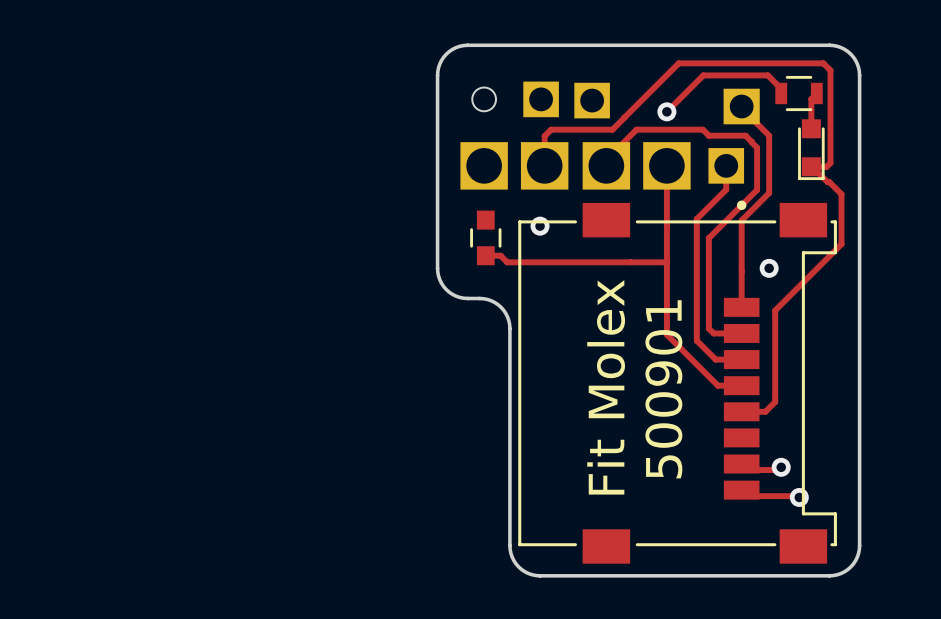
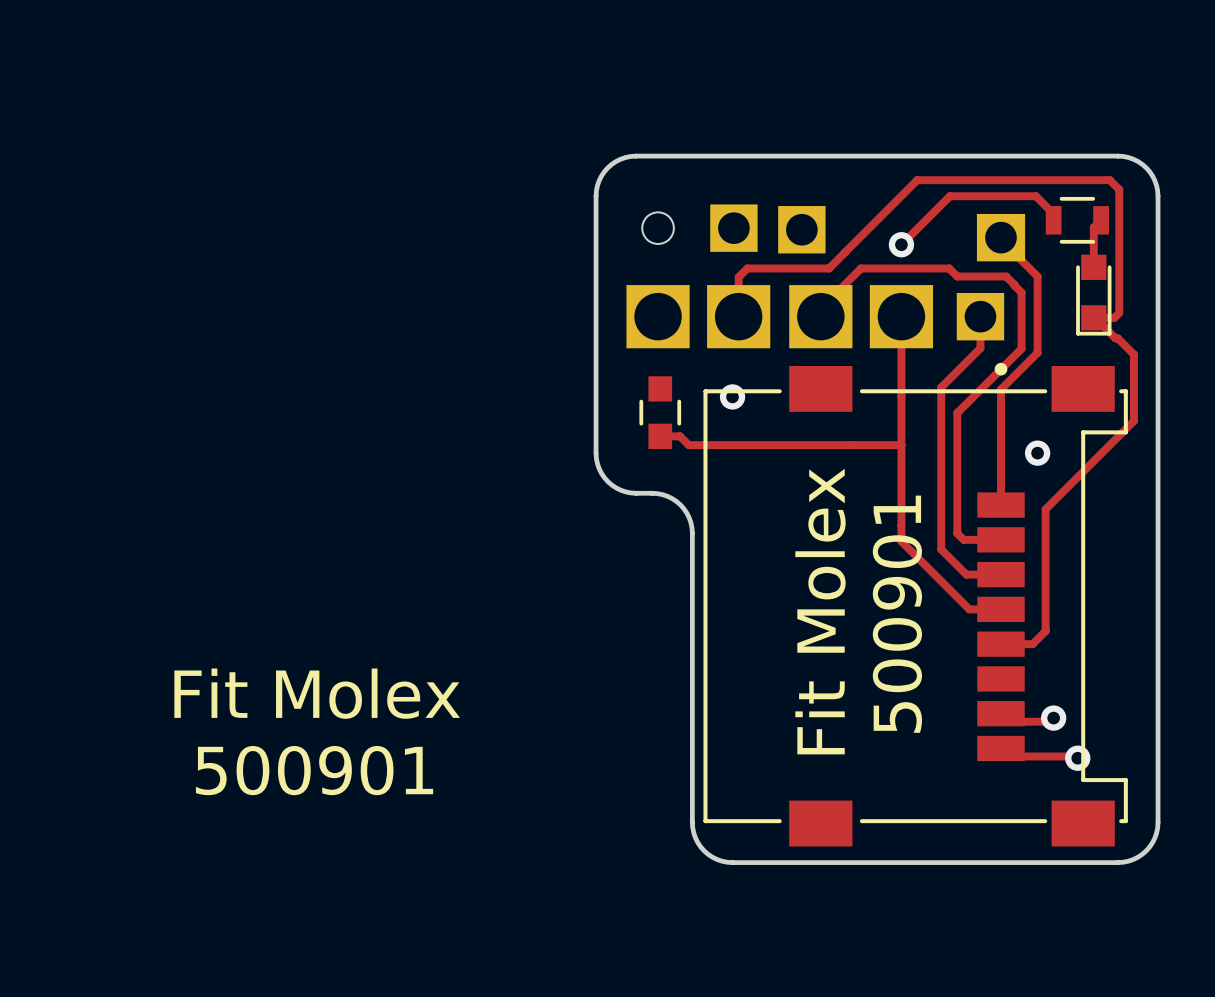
text: none -> Fit Molex (317, 693)
text: none -> 500901 (314, 770)

